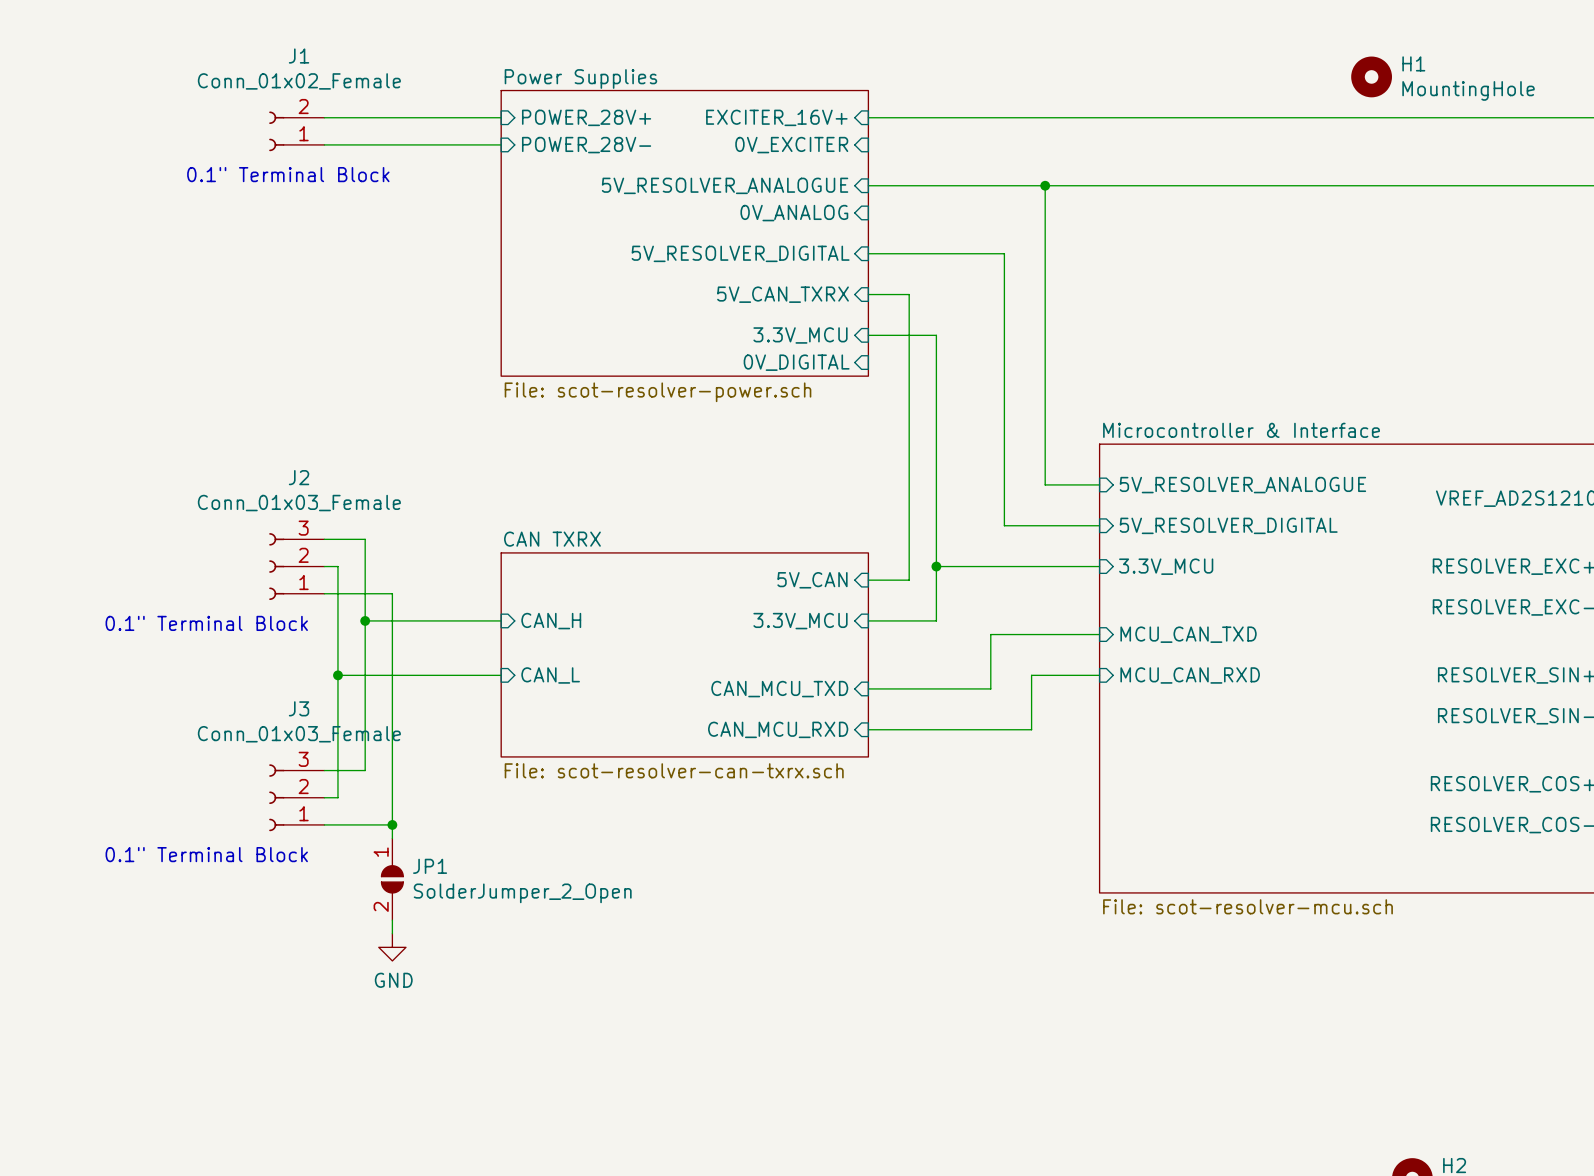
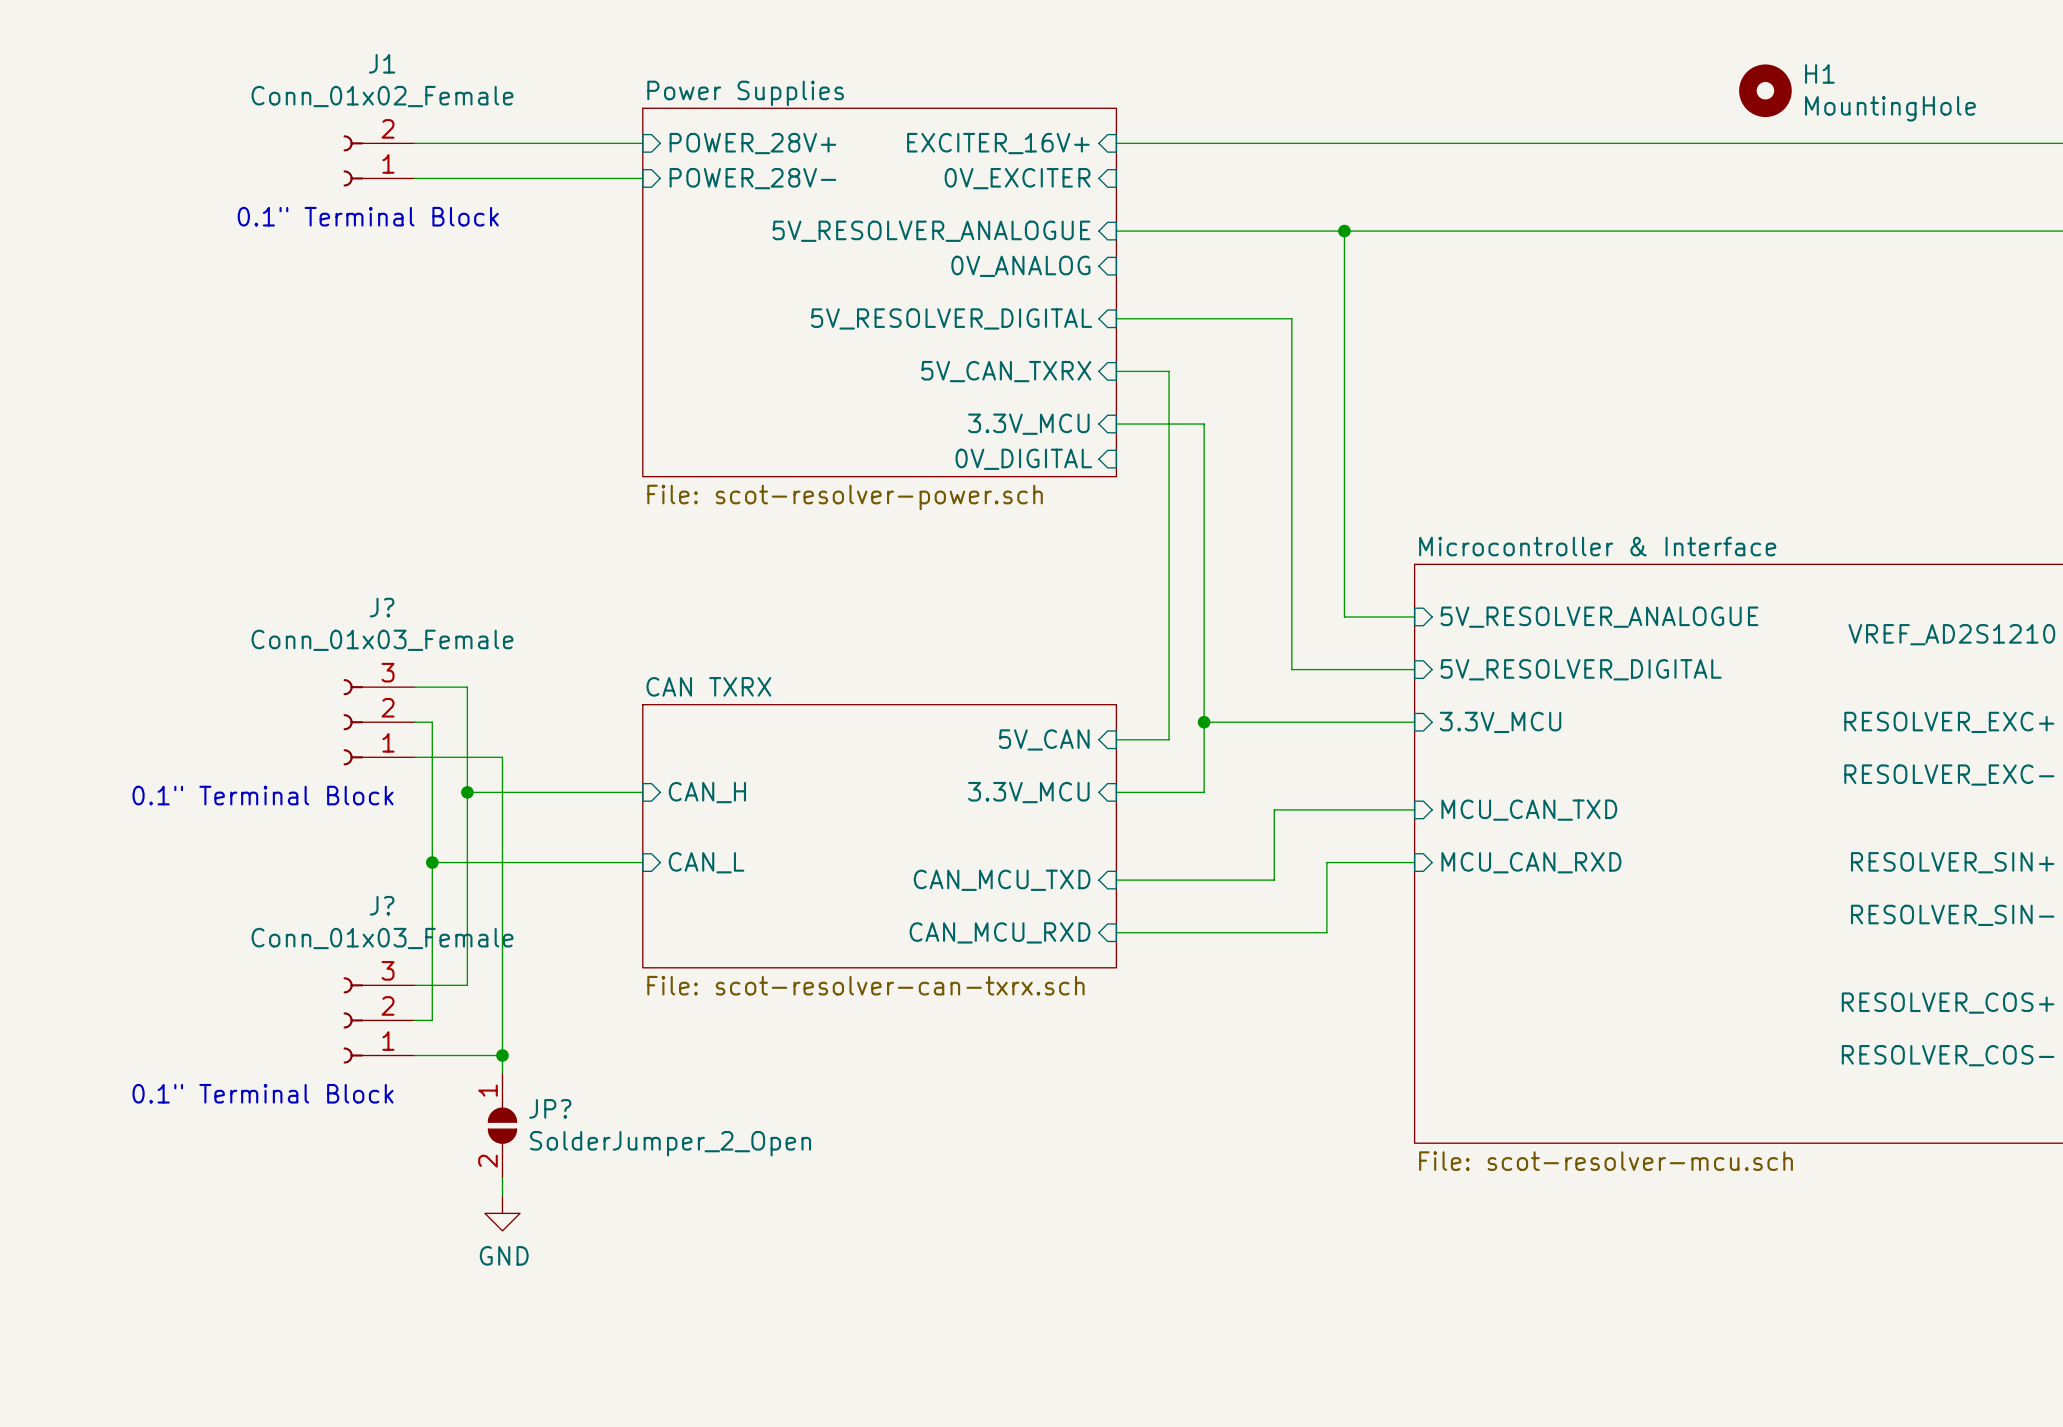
J2 name: J2 (299, 477) -> J? (382, 607)
J3 name: J3 (299, 708) -> J? (382, 905)
JP1 name: JP1 (430, 866) -> JP? (550, 1108)

